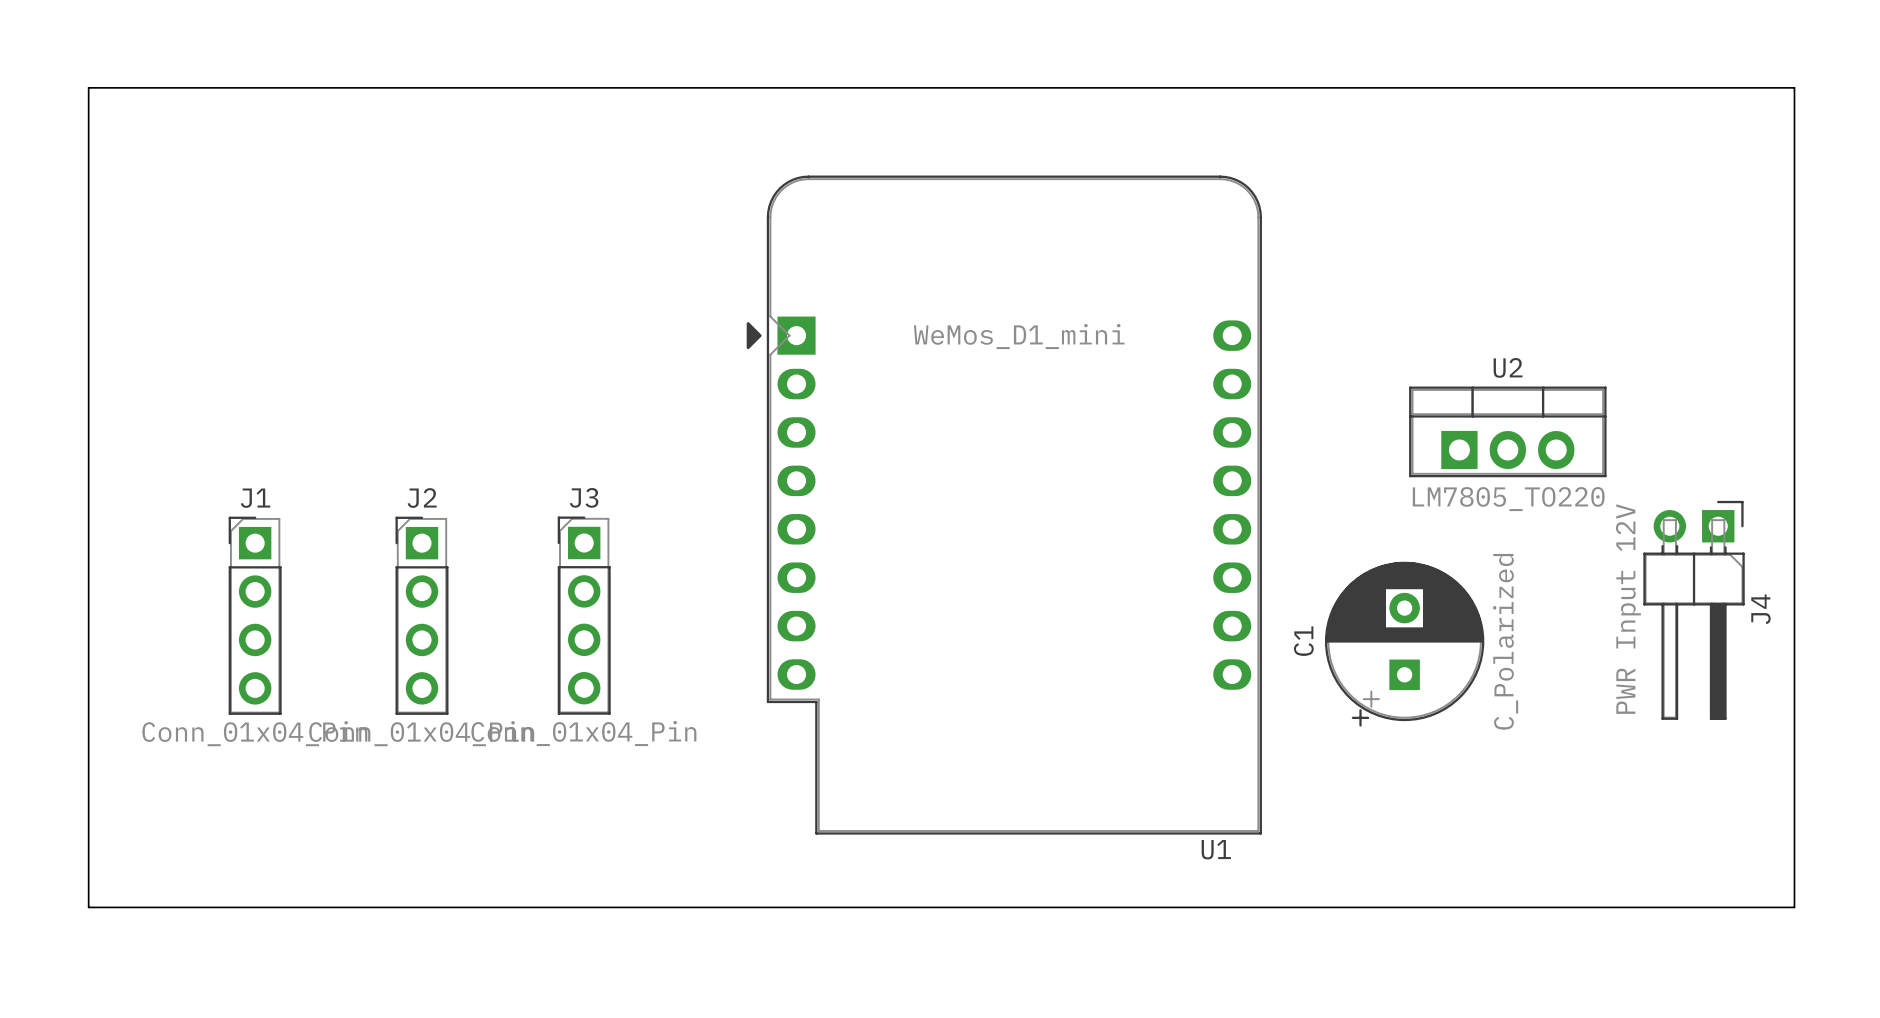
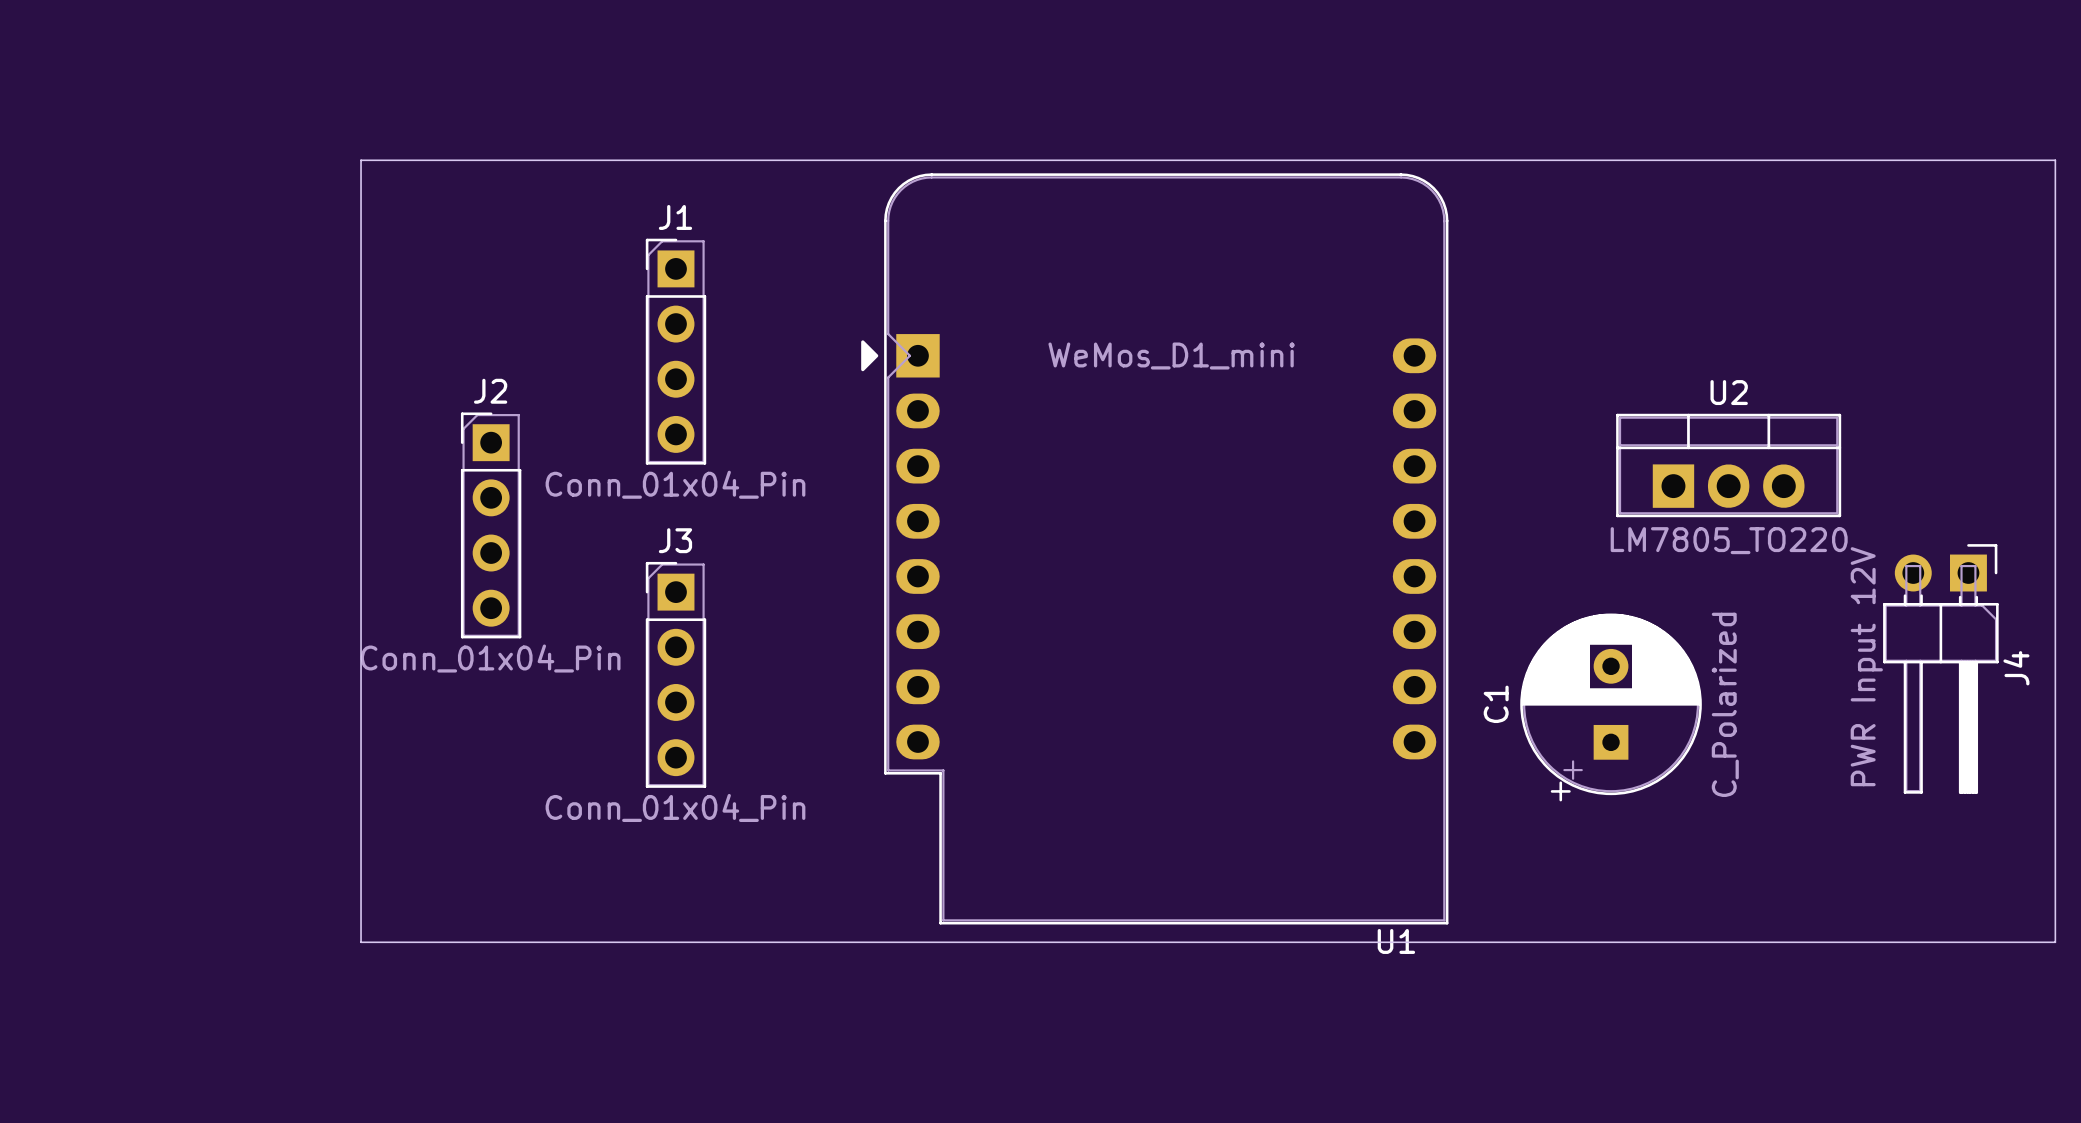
board edge: (1794, 164) (1794, 87) (88, 87) (88, 907) (1794, 907) (1794, 850) -> (2055, 160) (361, 160) (361, 942) (2055, 942)
J1 position: (255, 615) -> (675, 351)
J2 position: (422, 615) -> (491, 525)

